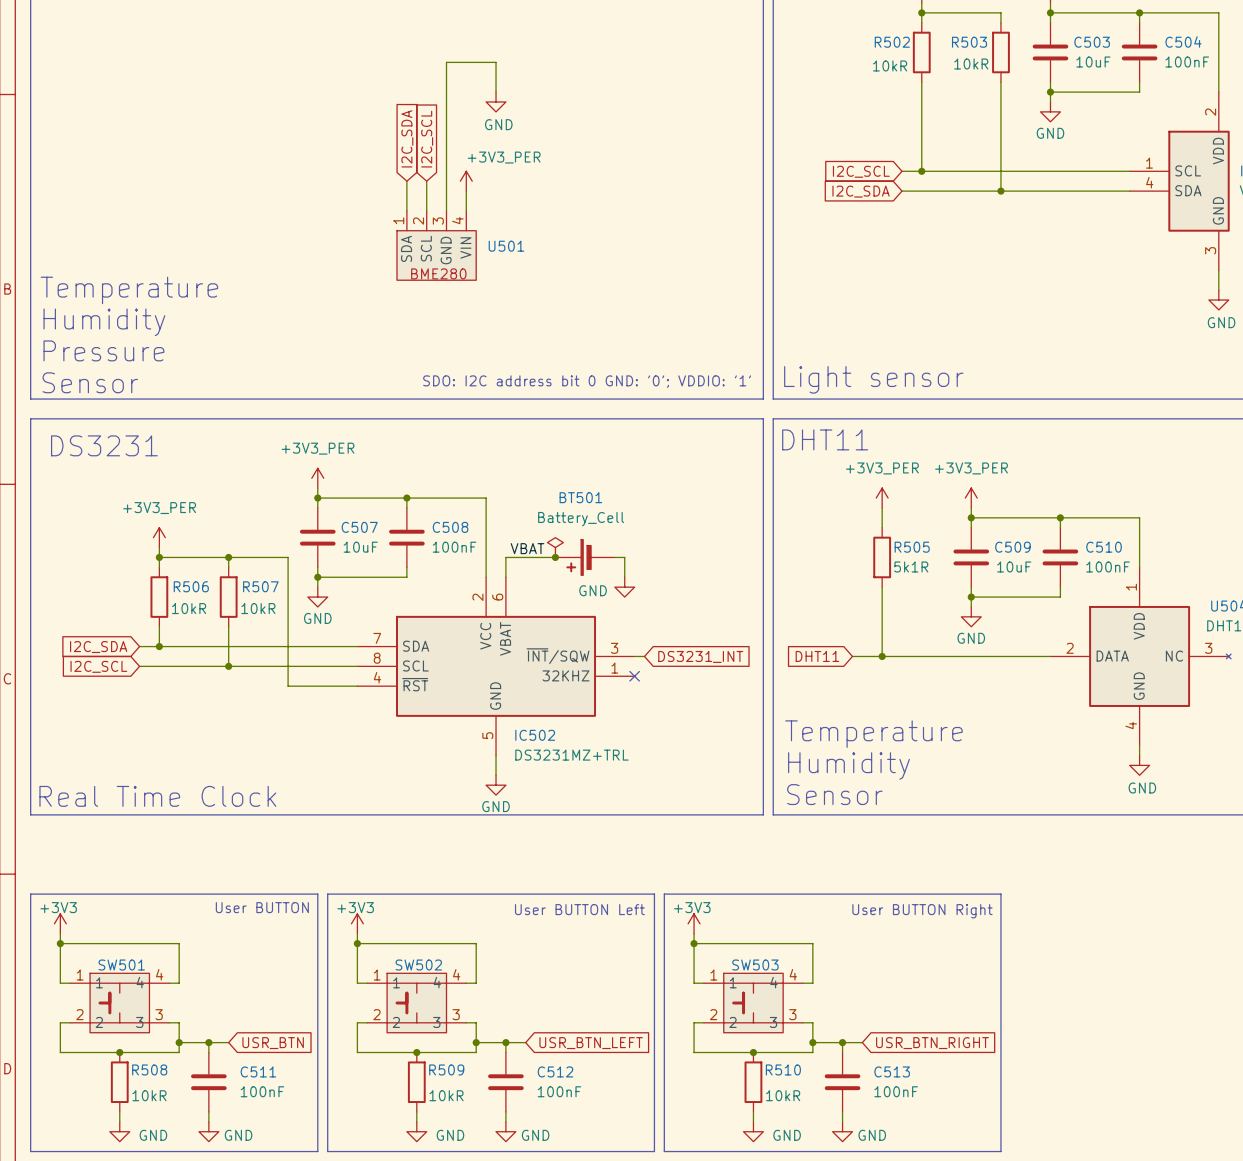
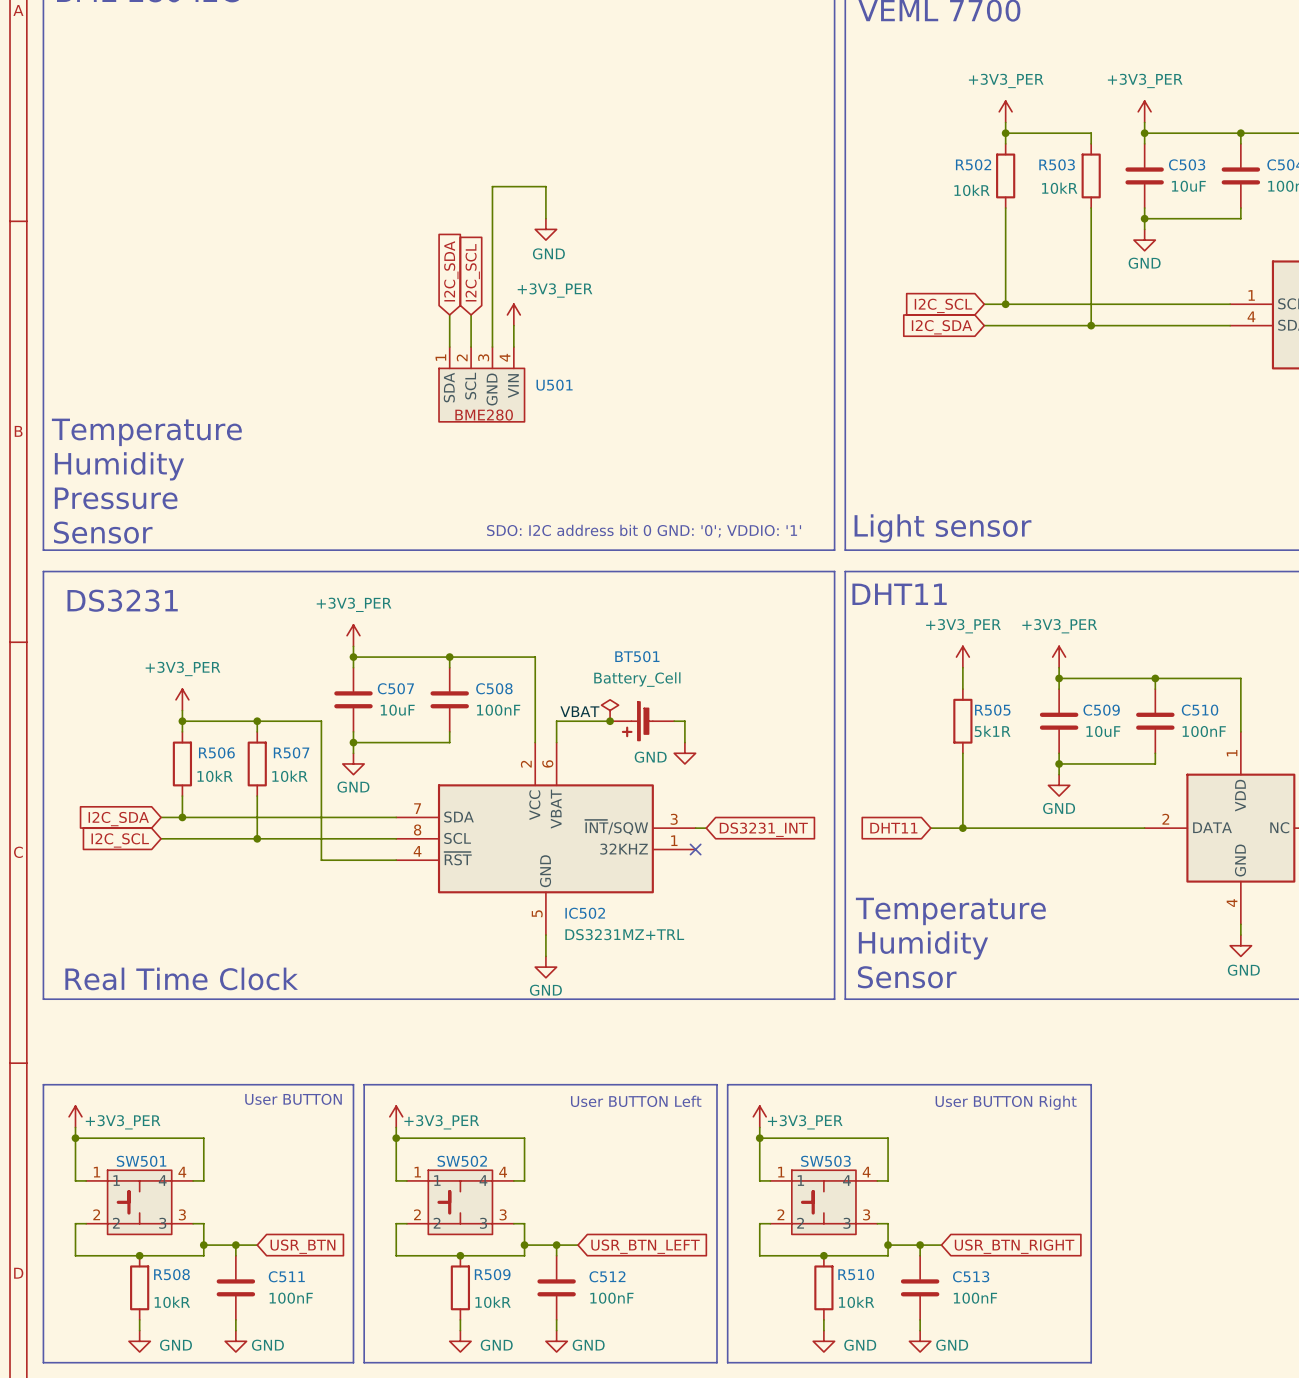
power symbol: +3V3 (60, 923) -> +3V3_PER (75, 1116)
power symbol: +3V3 (357, 923) -> +3V3_PER (396, 1116)
power symbol: +3V3 (694, 923) -> +3V3_PER (759, 1116)

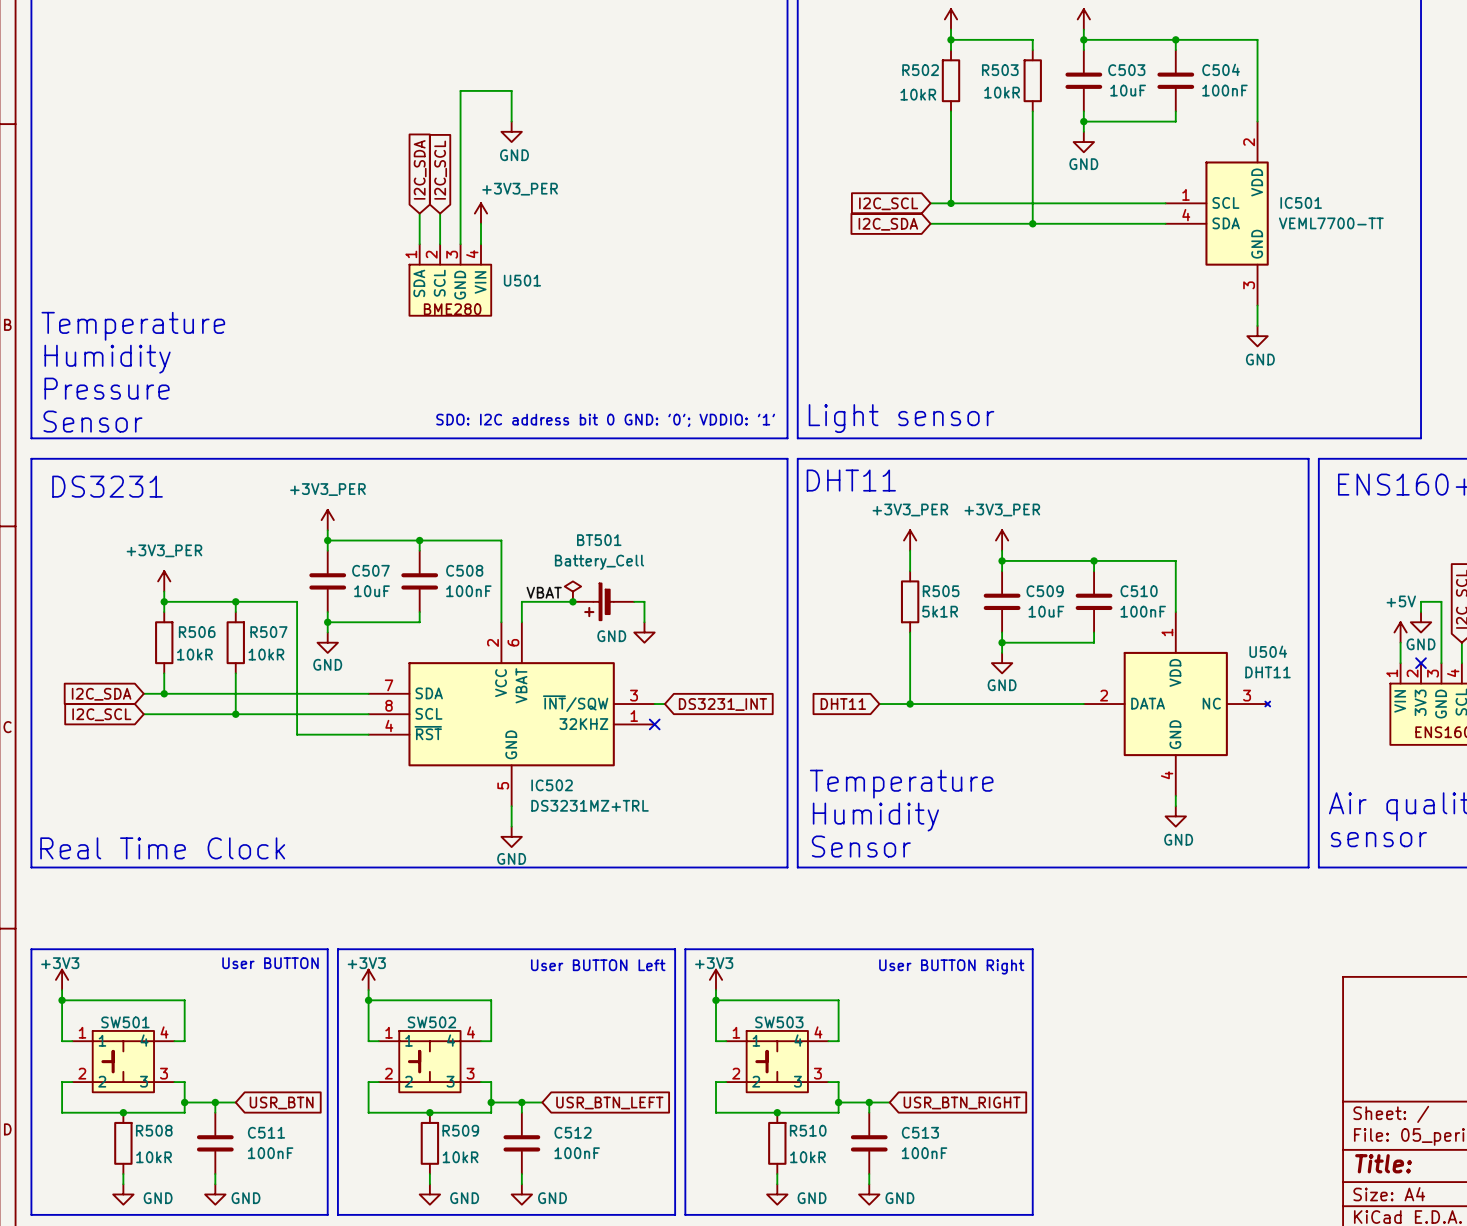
power symbol: +3V3_PER (75, 1116) -> +3V3 (62, 979)
power symbol: +3V3_PER (396, 1116) -> +3V3 (368, 979)
power symbol: +3V3_PER (759, 1116) -> +3V3 (715, 979)

